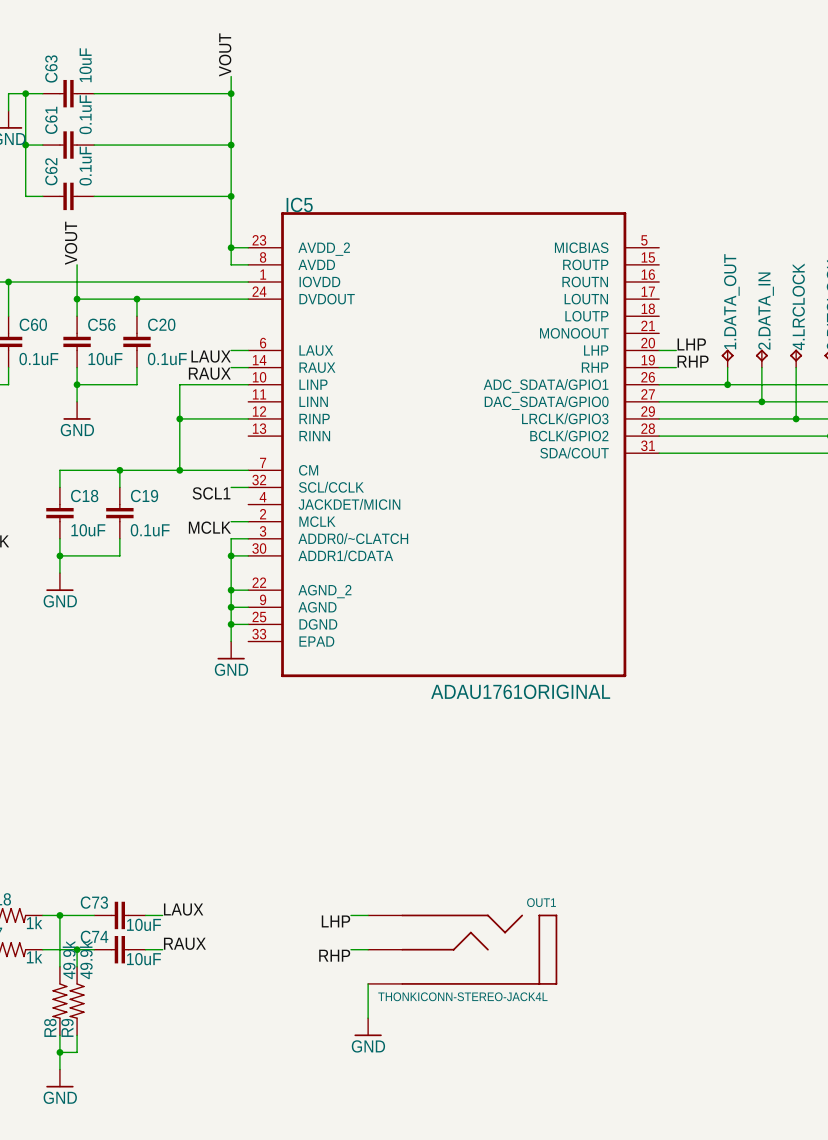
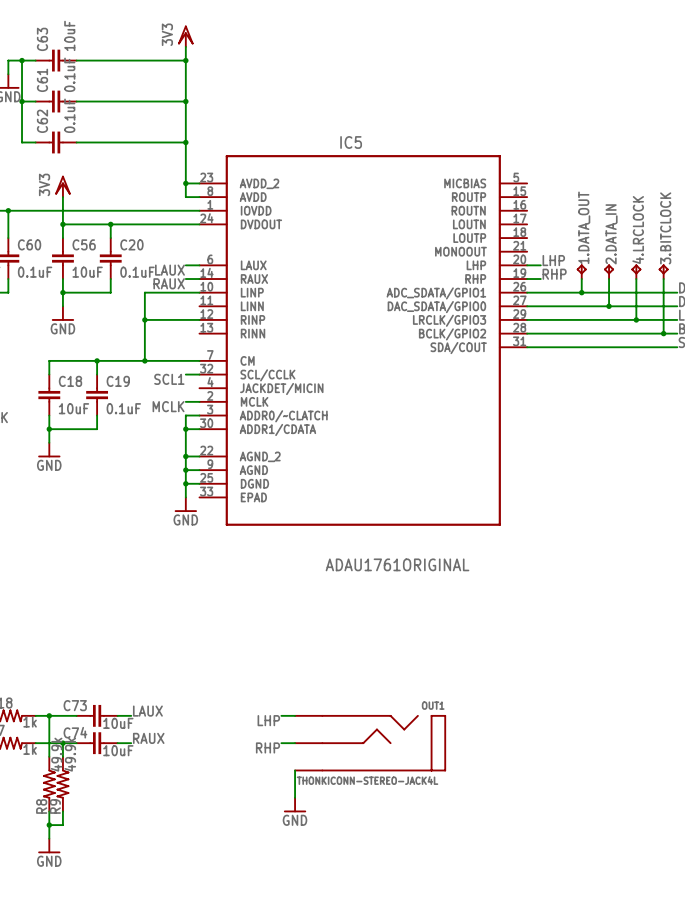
label: VOUT (225, 54) -> none
power symbol: none -> 3V3 (185, 36)
IC5 name position: IC5 (299, 204) -> IC5 (351, 142)
label: VOUT (71, 243) -> none
power symbol: none -> 3V3 (62, 186)
IC5 value position: ADAU1761ORIGINAL (520, 691) -> ADAU1761ORIGINAL (397, 564)

